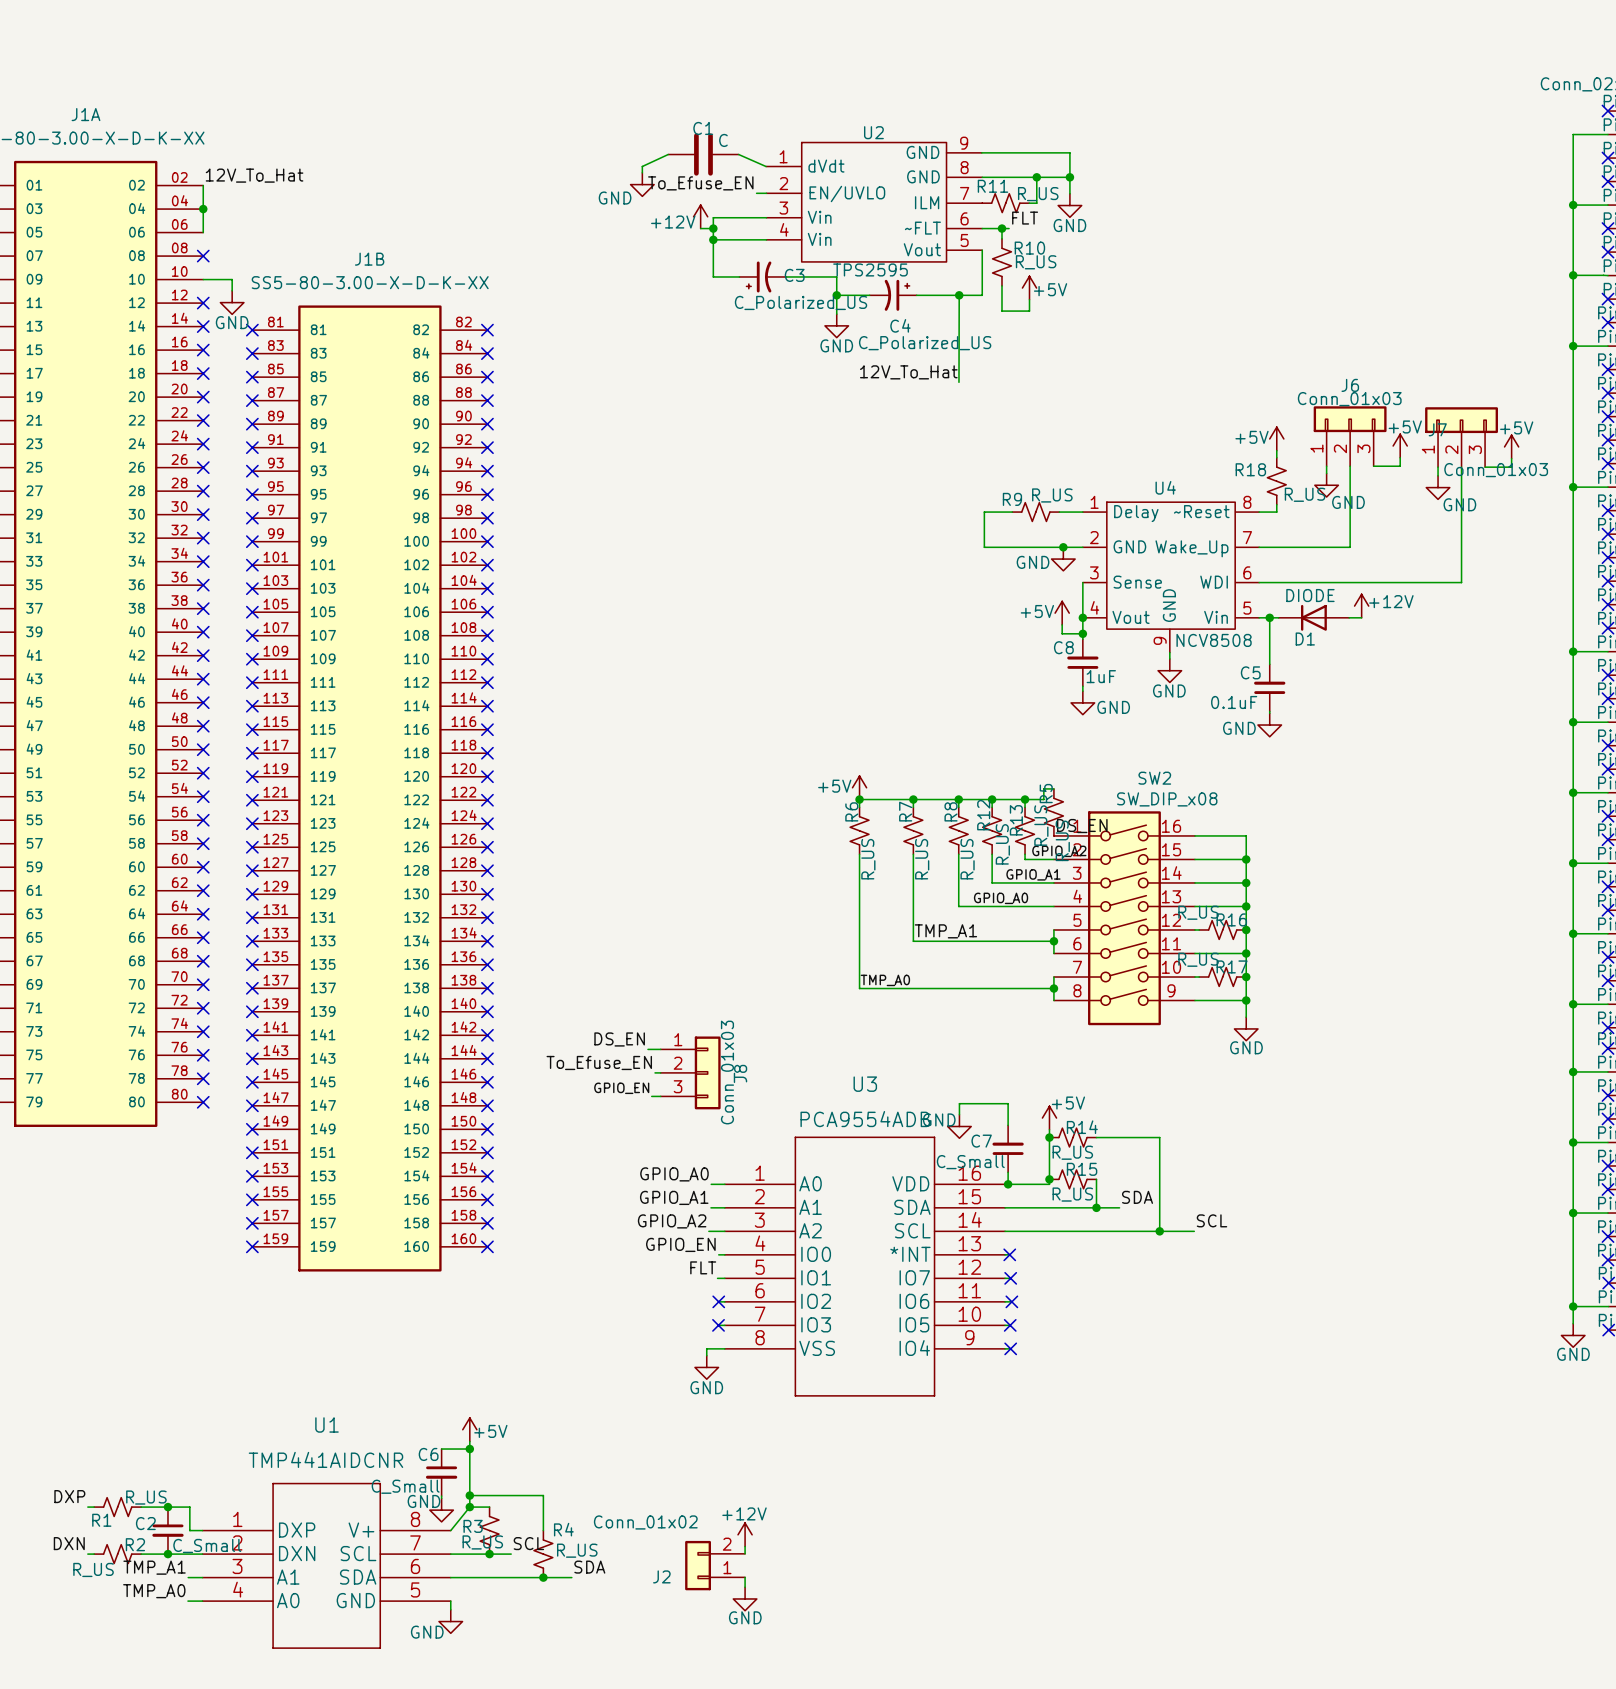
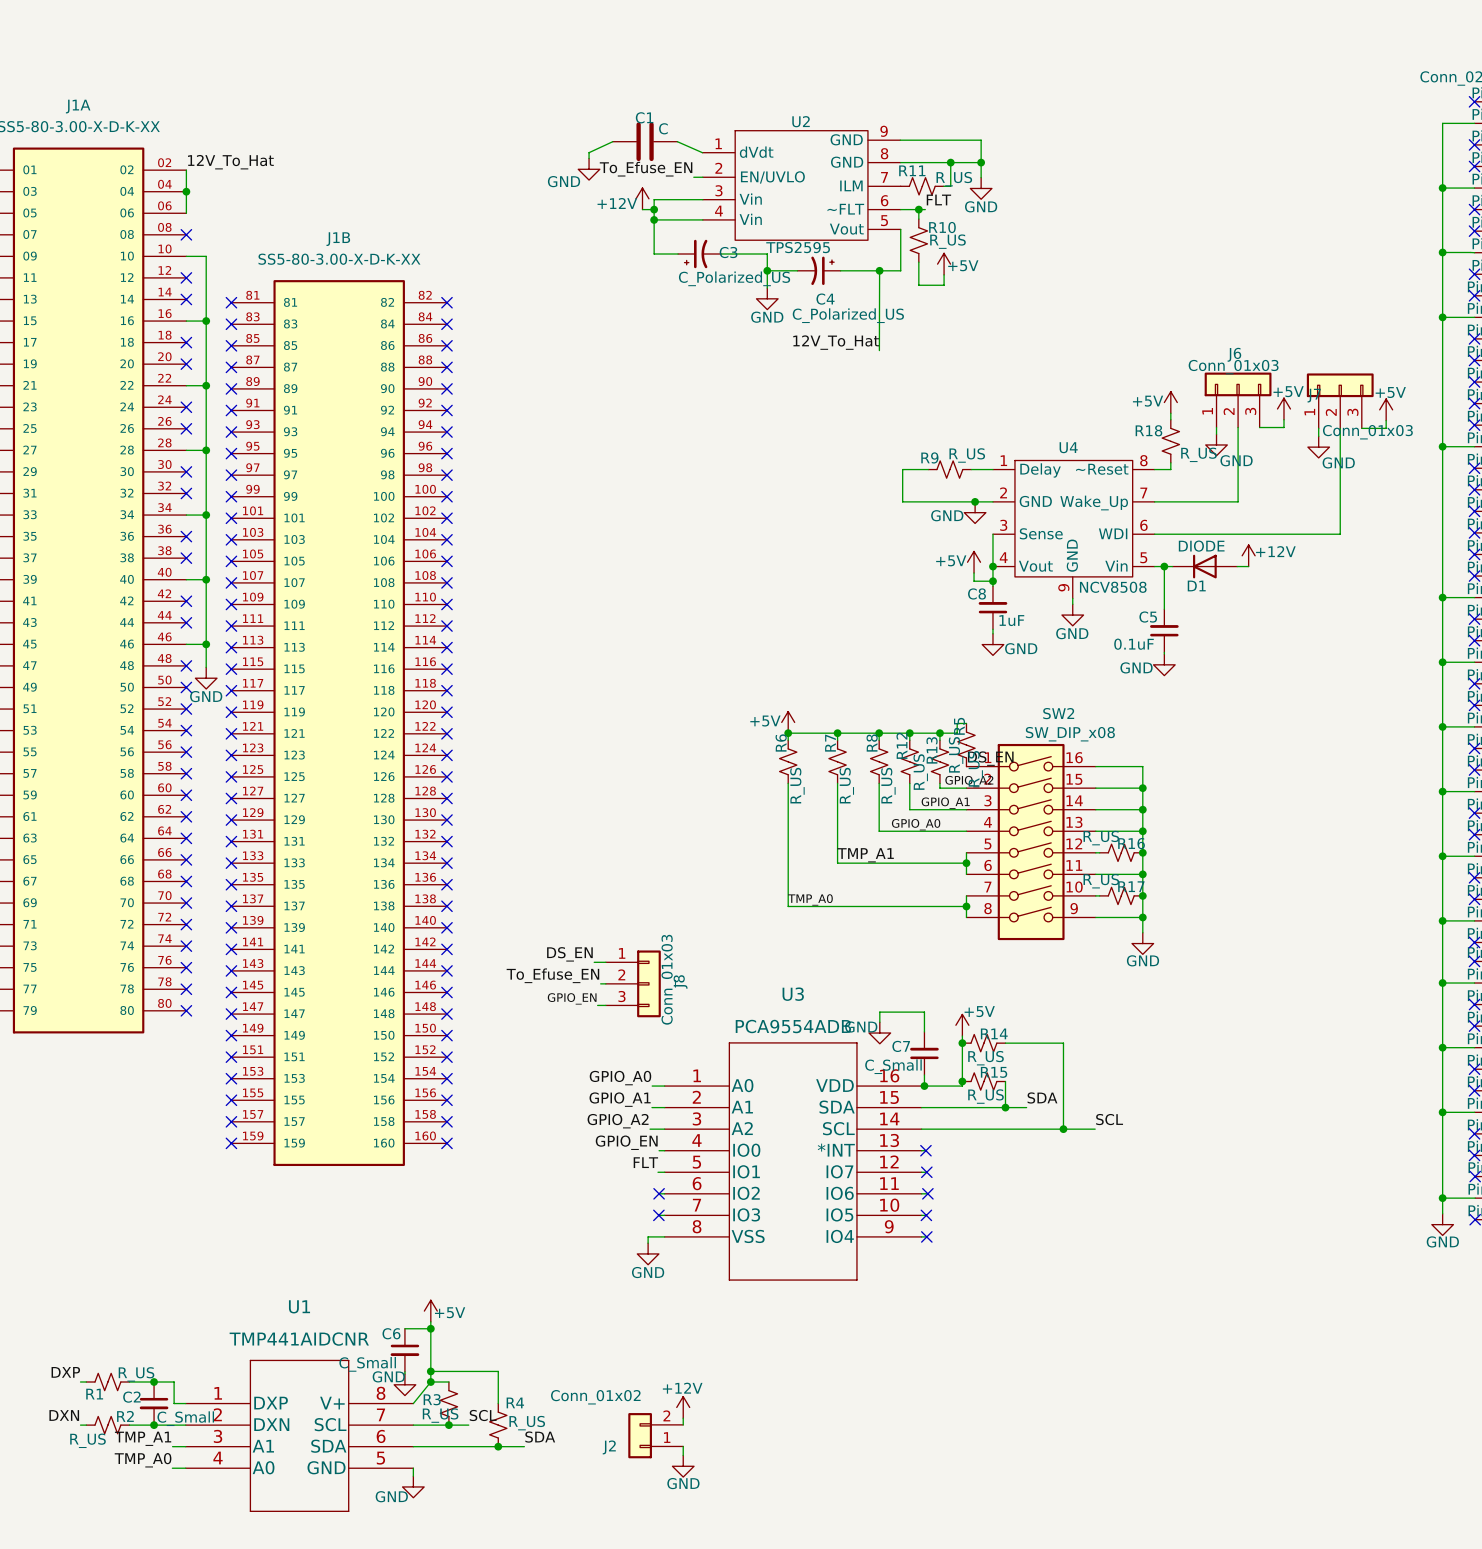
wire: (224, 279) (232, 279) (232, 290) -> (206, 256) (206, 667)
power symbol: GND (232, 302) -> none
wire: none -> (186, 321) (206, 321)
no-connect mark: (203, 350) -> none
junction: none -> (206, 321)
wire: none -> (186, 385) (206, 385)
no-connect mark: (203, 420) -> none
junction: none -> (206, 385)
wire: none -> (186, 450) (206, 450)
no-connect mark: (203, 491) -> none
junction: none -> (206, 450)
wire: none -> (186, 515) (206, 515)
no-connect mark: (203, 561) -> none
junction: none -> (206, 515)
wire: none -> (186, 579) (206, 579)
no-connect mark: (203, 632) -> none
junction: none -> (206, 579)
wire: none -> (186, 644) (206, 644)
no-connect mark: (203, 702) -> none
junction: none -> (206, 644)
power symbol: none -> GND (206, 678)

